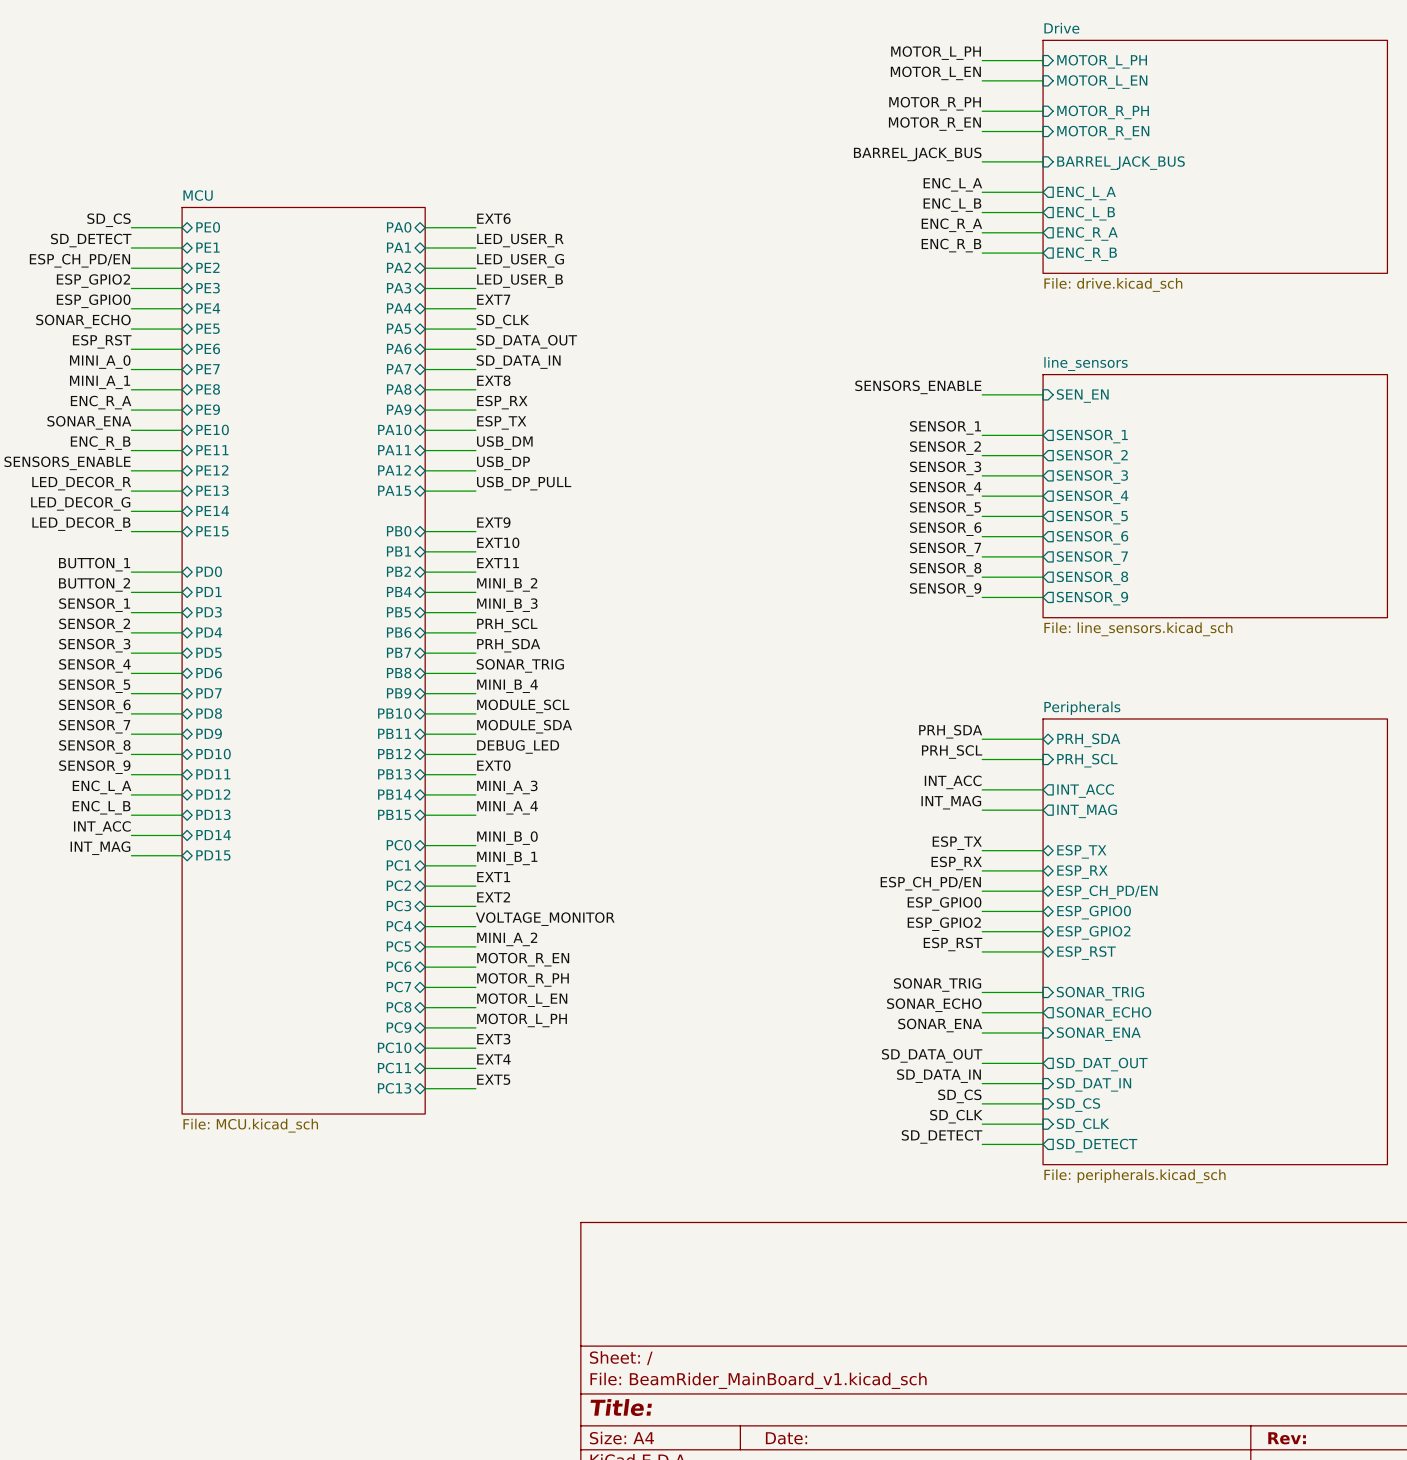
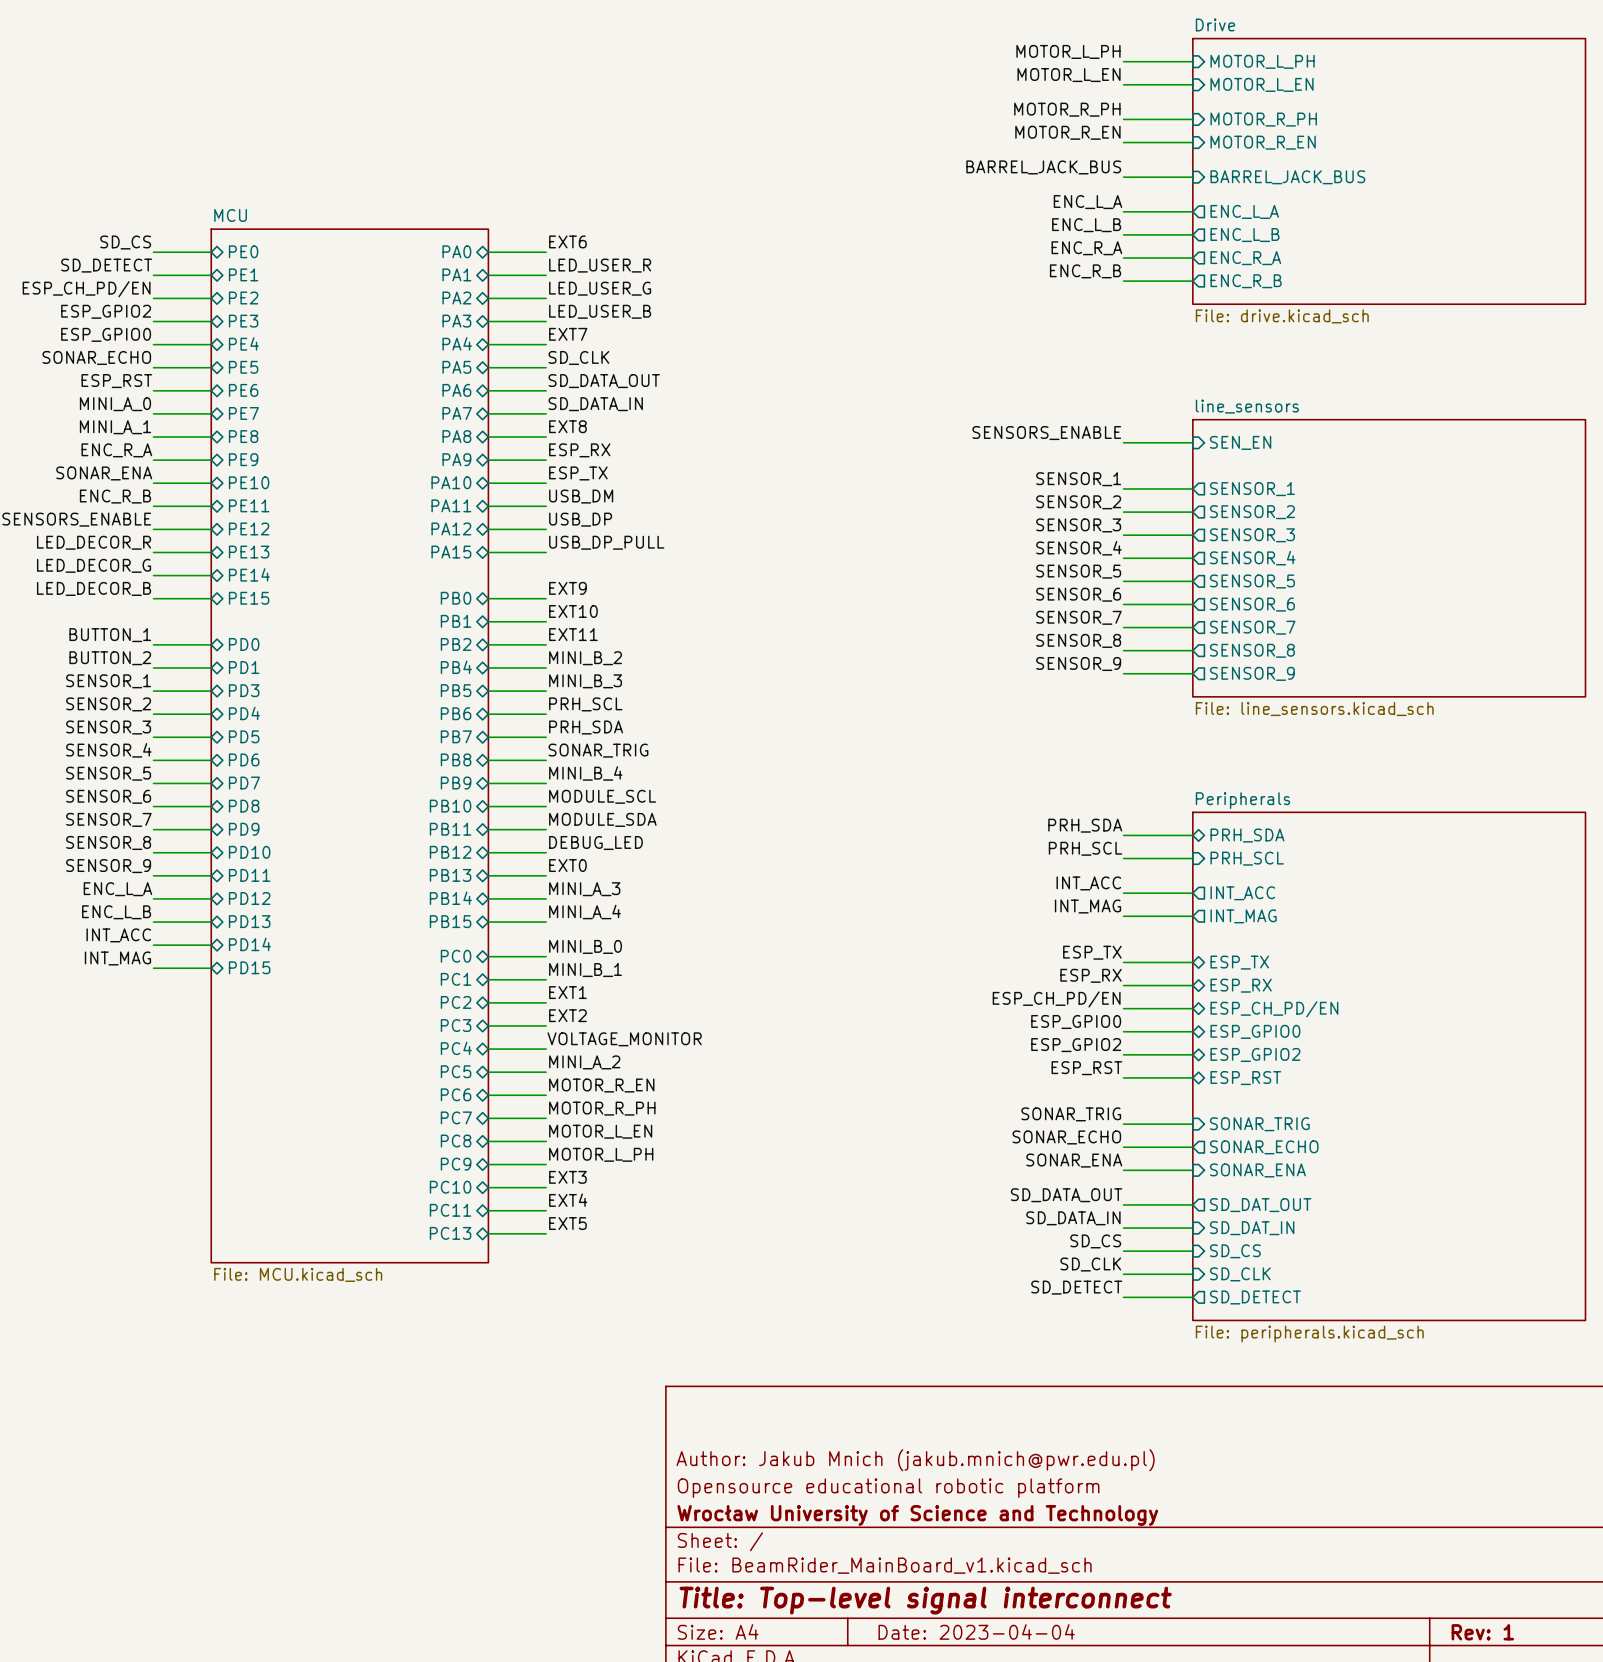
title block: none -> Author: Jakub Mnich (jakub.mnich@pwr.edu.pl) (915, 1460)
title block: none -> Opensource educational robotic platform (888, 1488)
title block: none -> Wrocław University of Science and Technology (917, 1515)
title block: Title: (621, 1407) -> Title: Top-level signal interconnect (925, 1600)
title block: Date: (786, 1438) -> Date: 2023-04-04 (976, 1631)
title block: Rev: (1287, 1438) -> Rev: 1 (1482, 1632)

